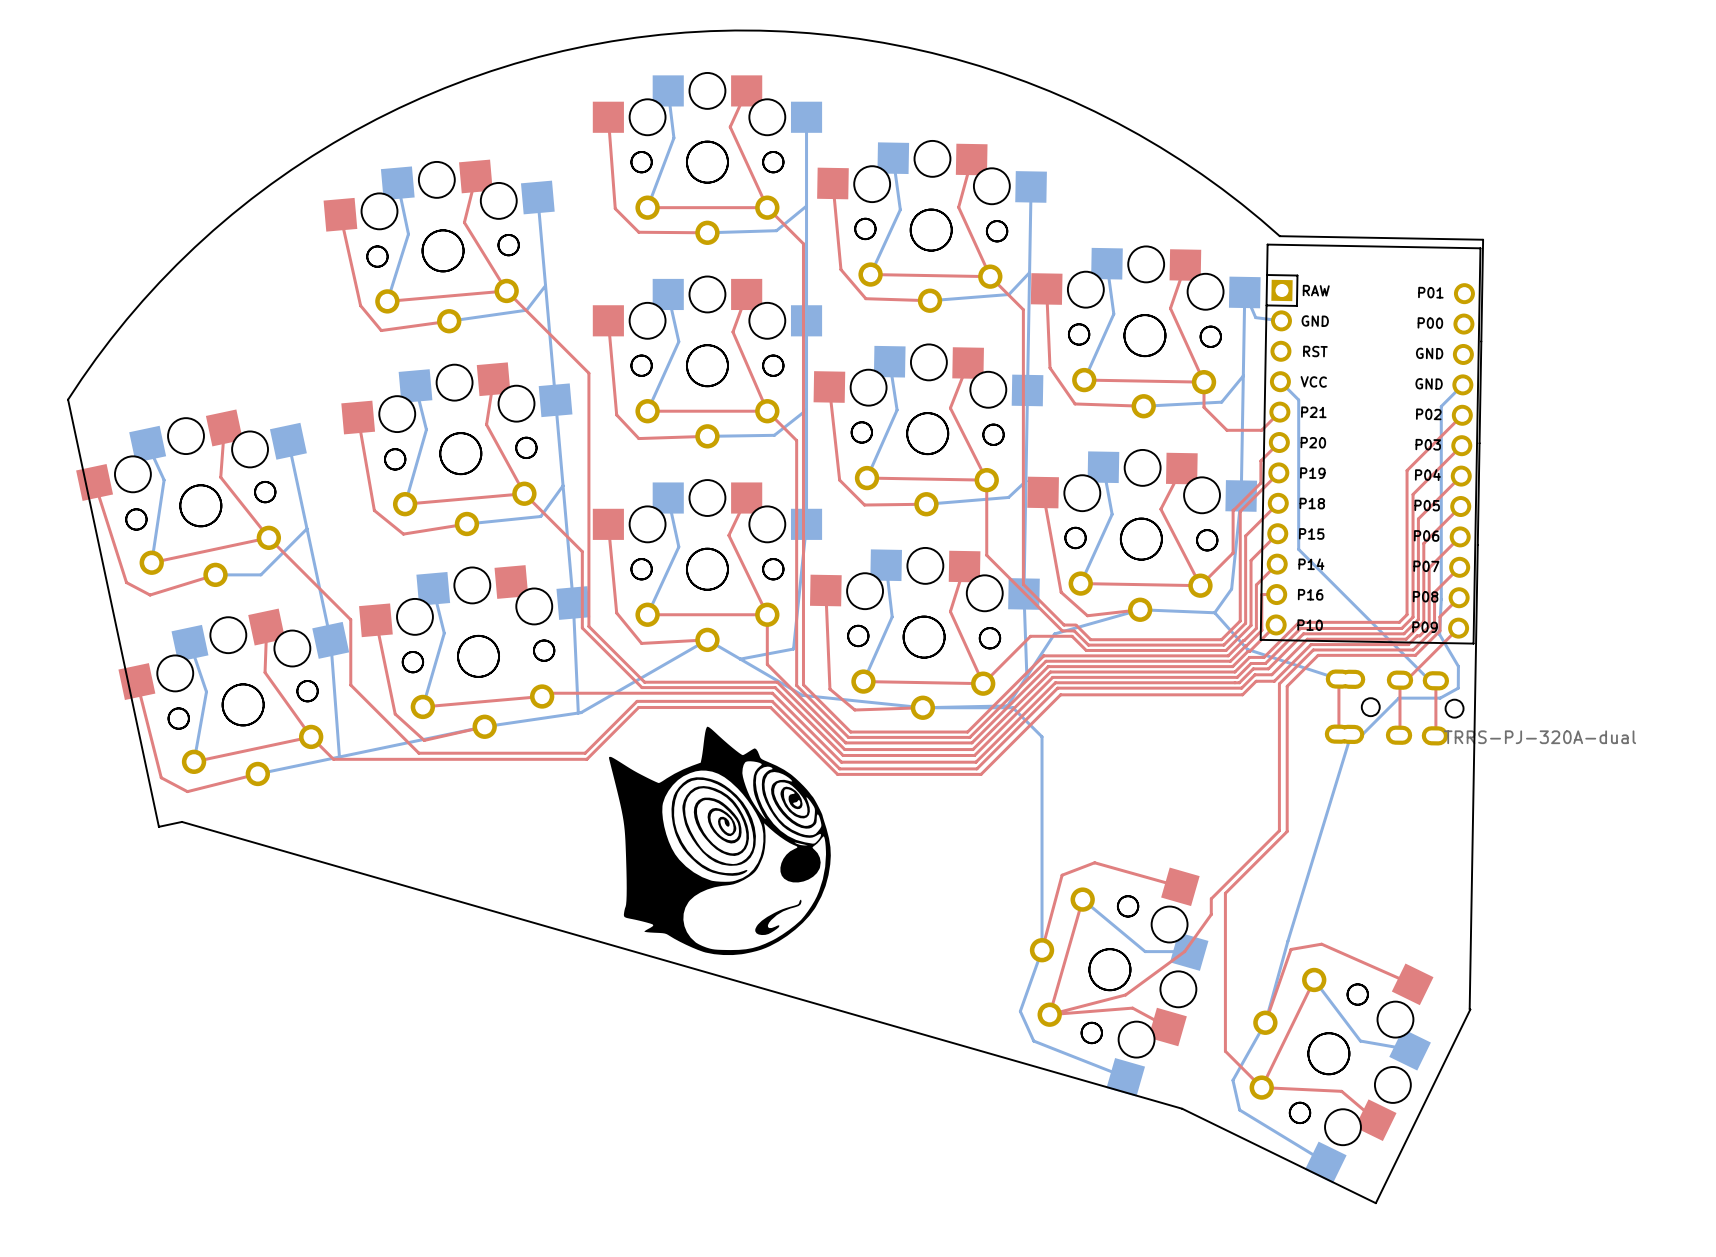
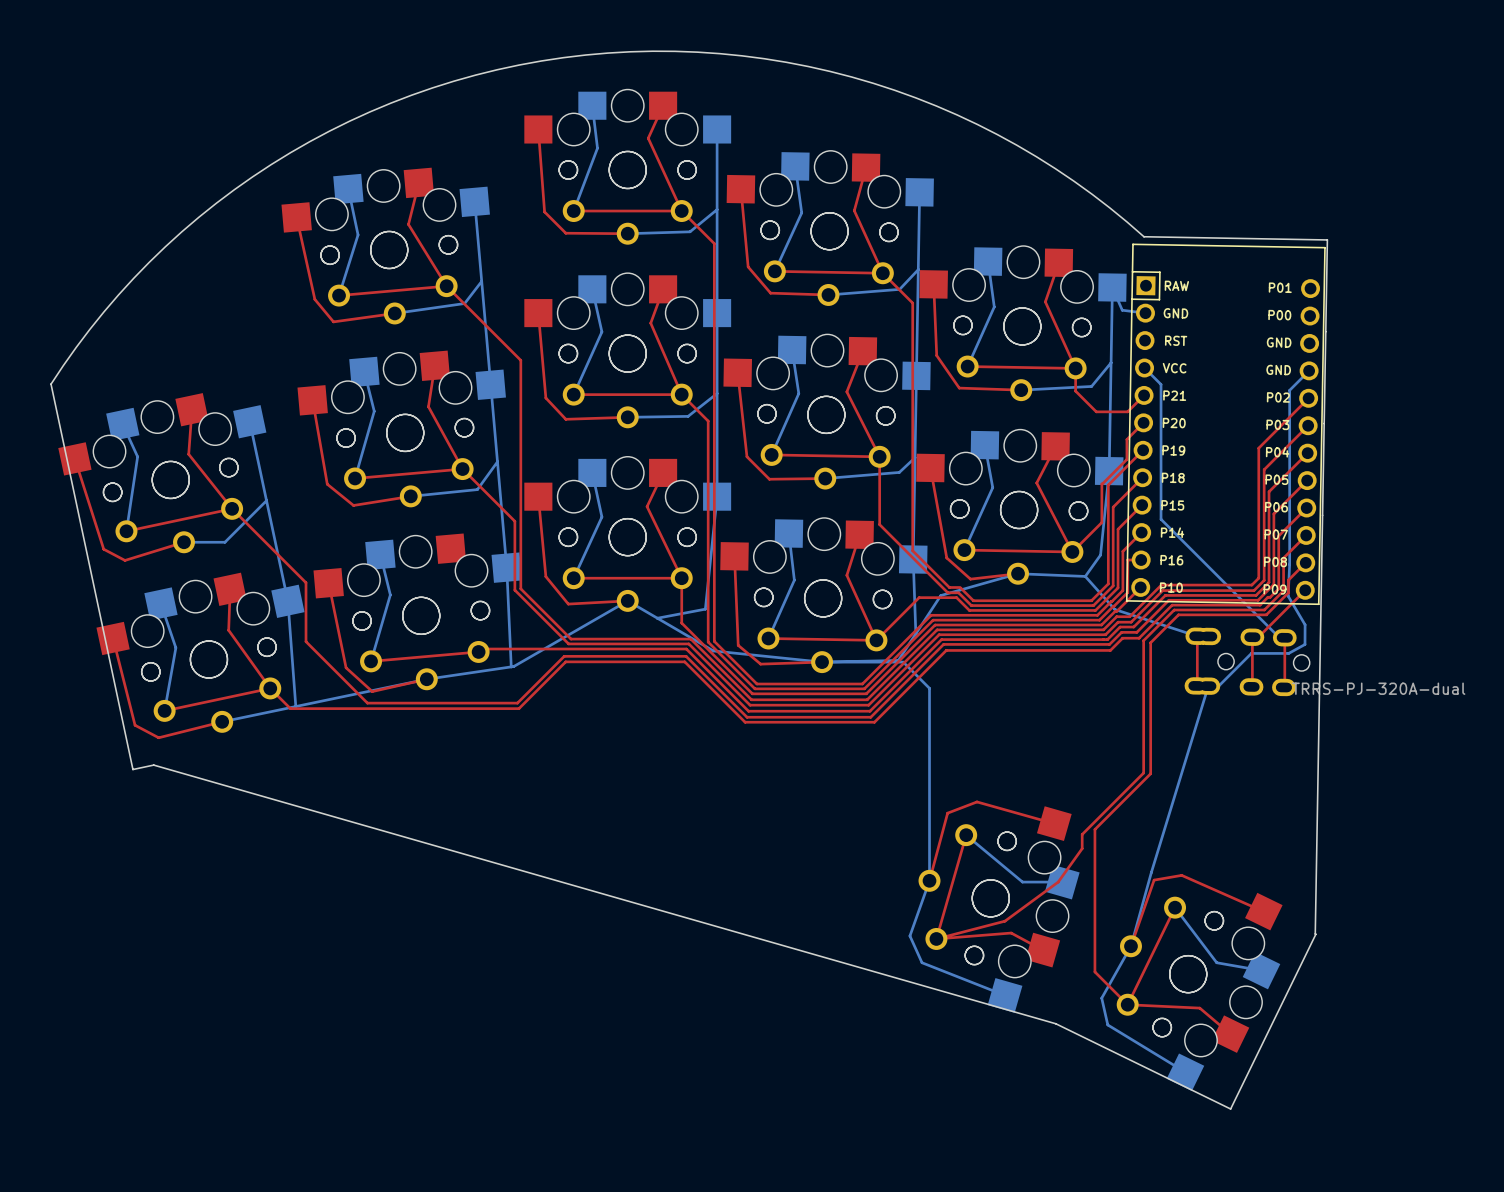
drawing: [608, 726, 831, 956] -> none

